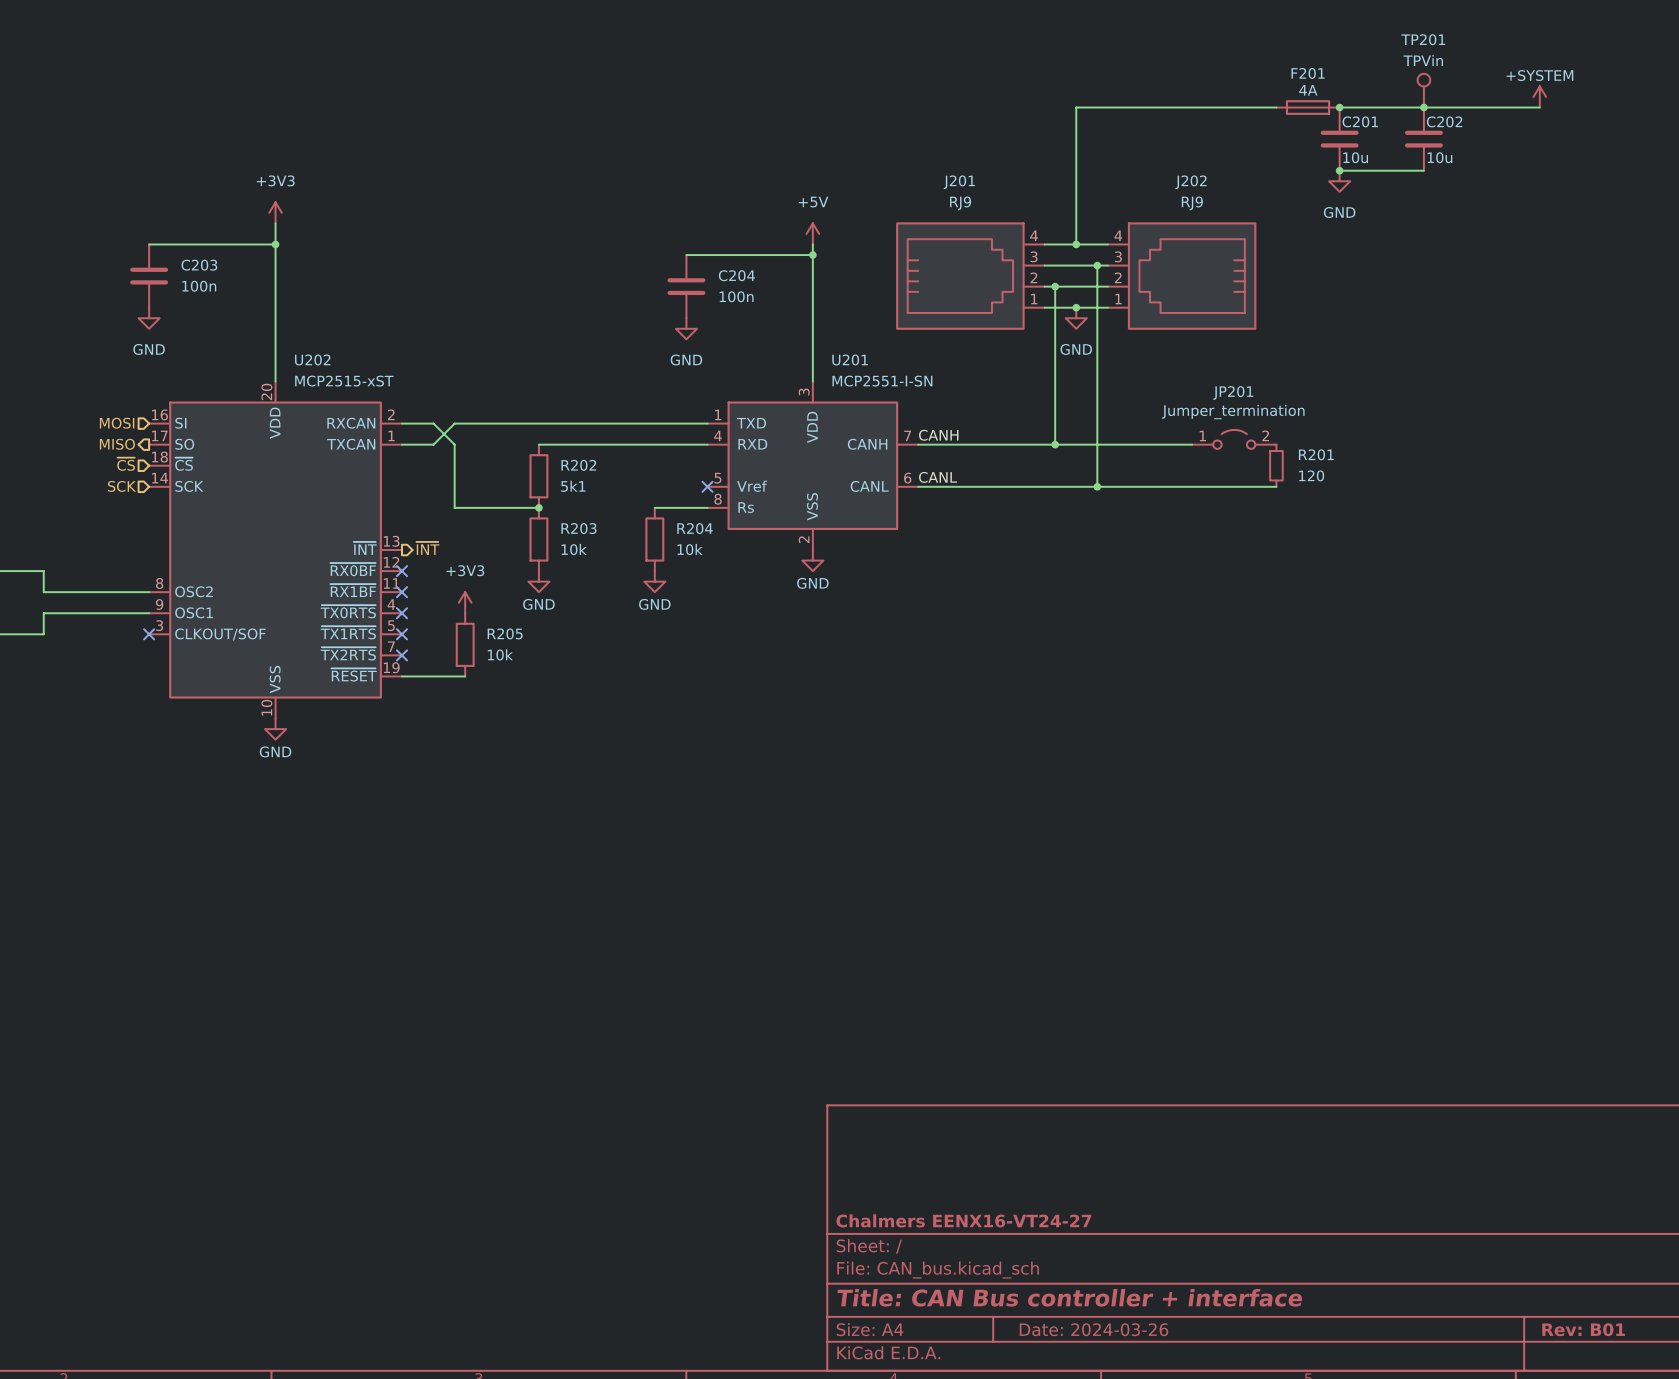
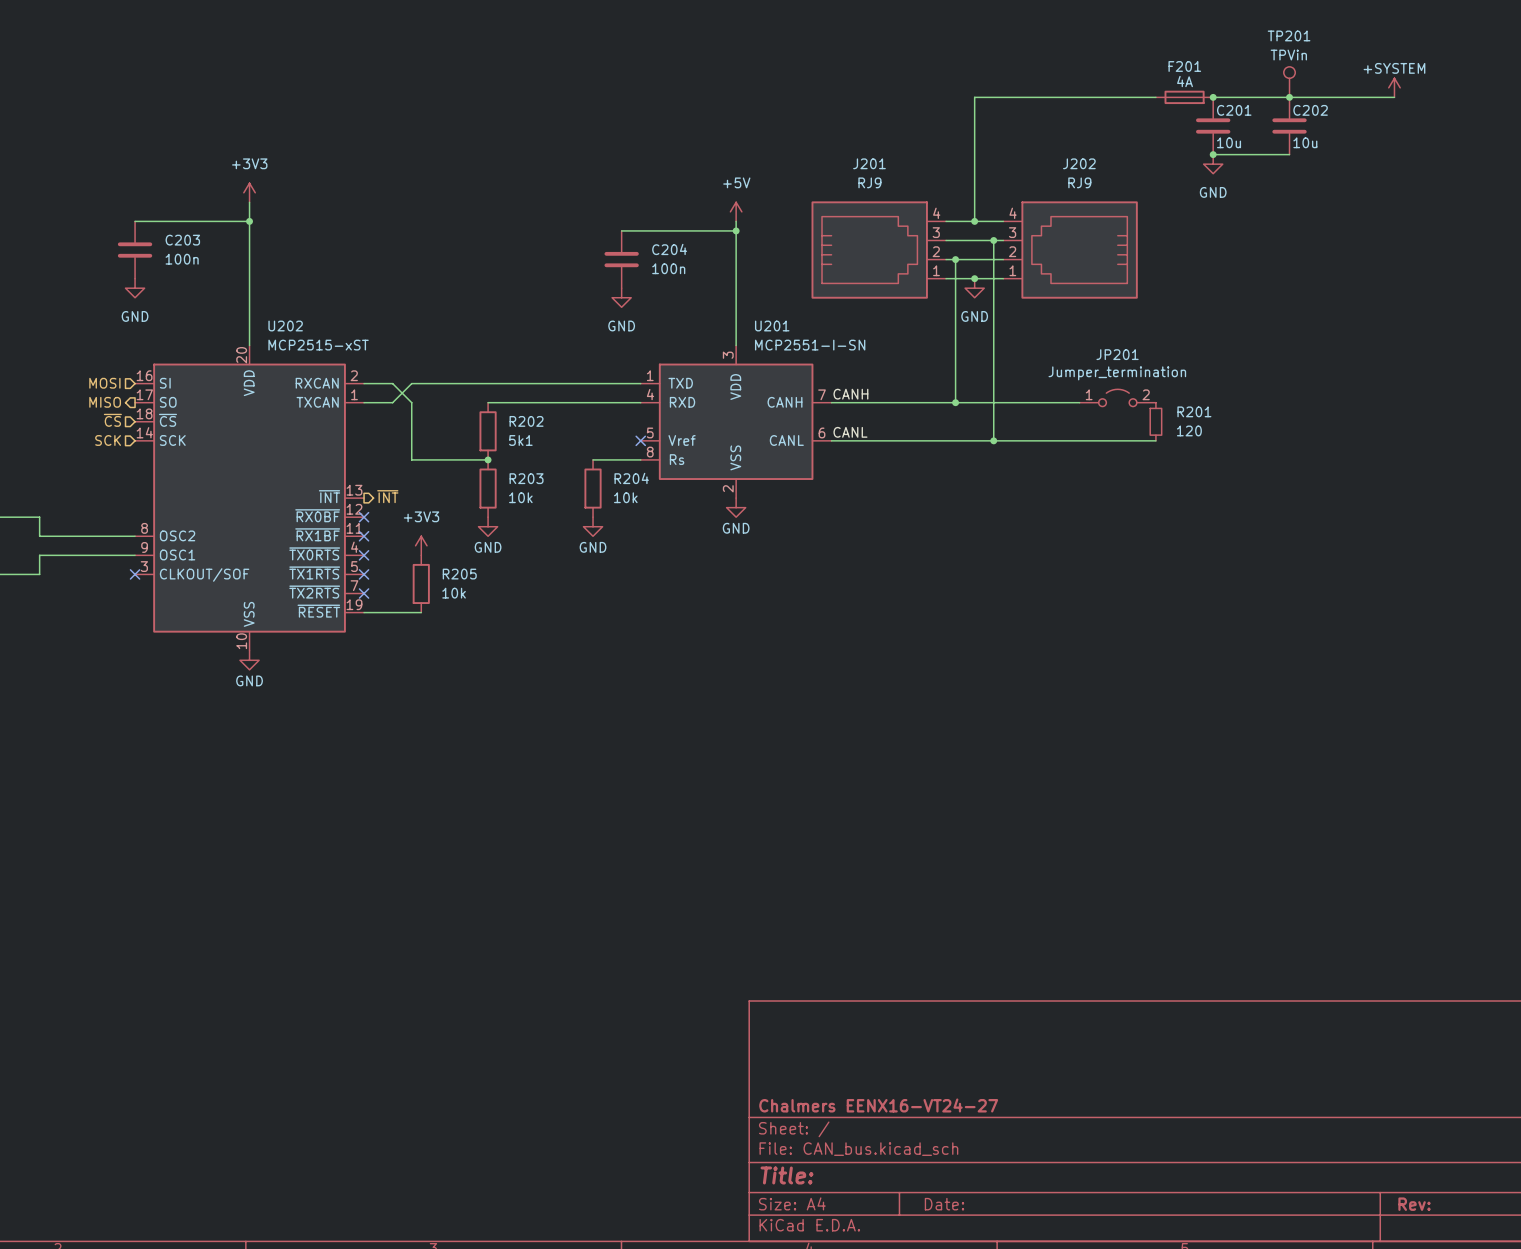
title block: Title: CAN Bus controller + interface (1069, 1297) -> Title: (787, 1175)
title block: Date: 2024-03-26 (1093, 1329) -> Date: (944, 1204)
title block: Rev: B01 (1583, 1329) -> Rev: (1414, 1204)

